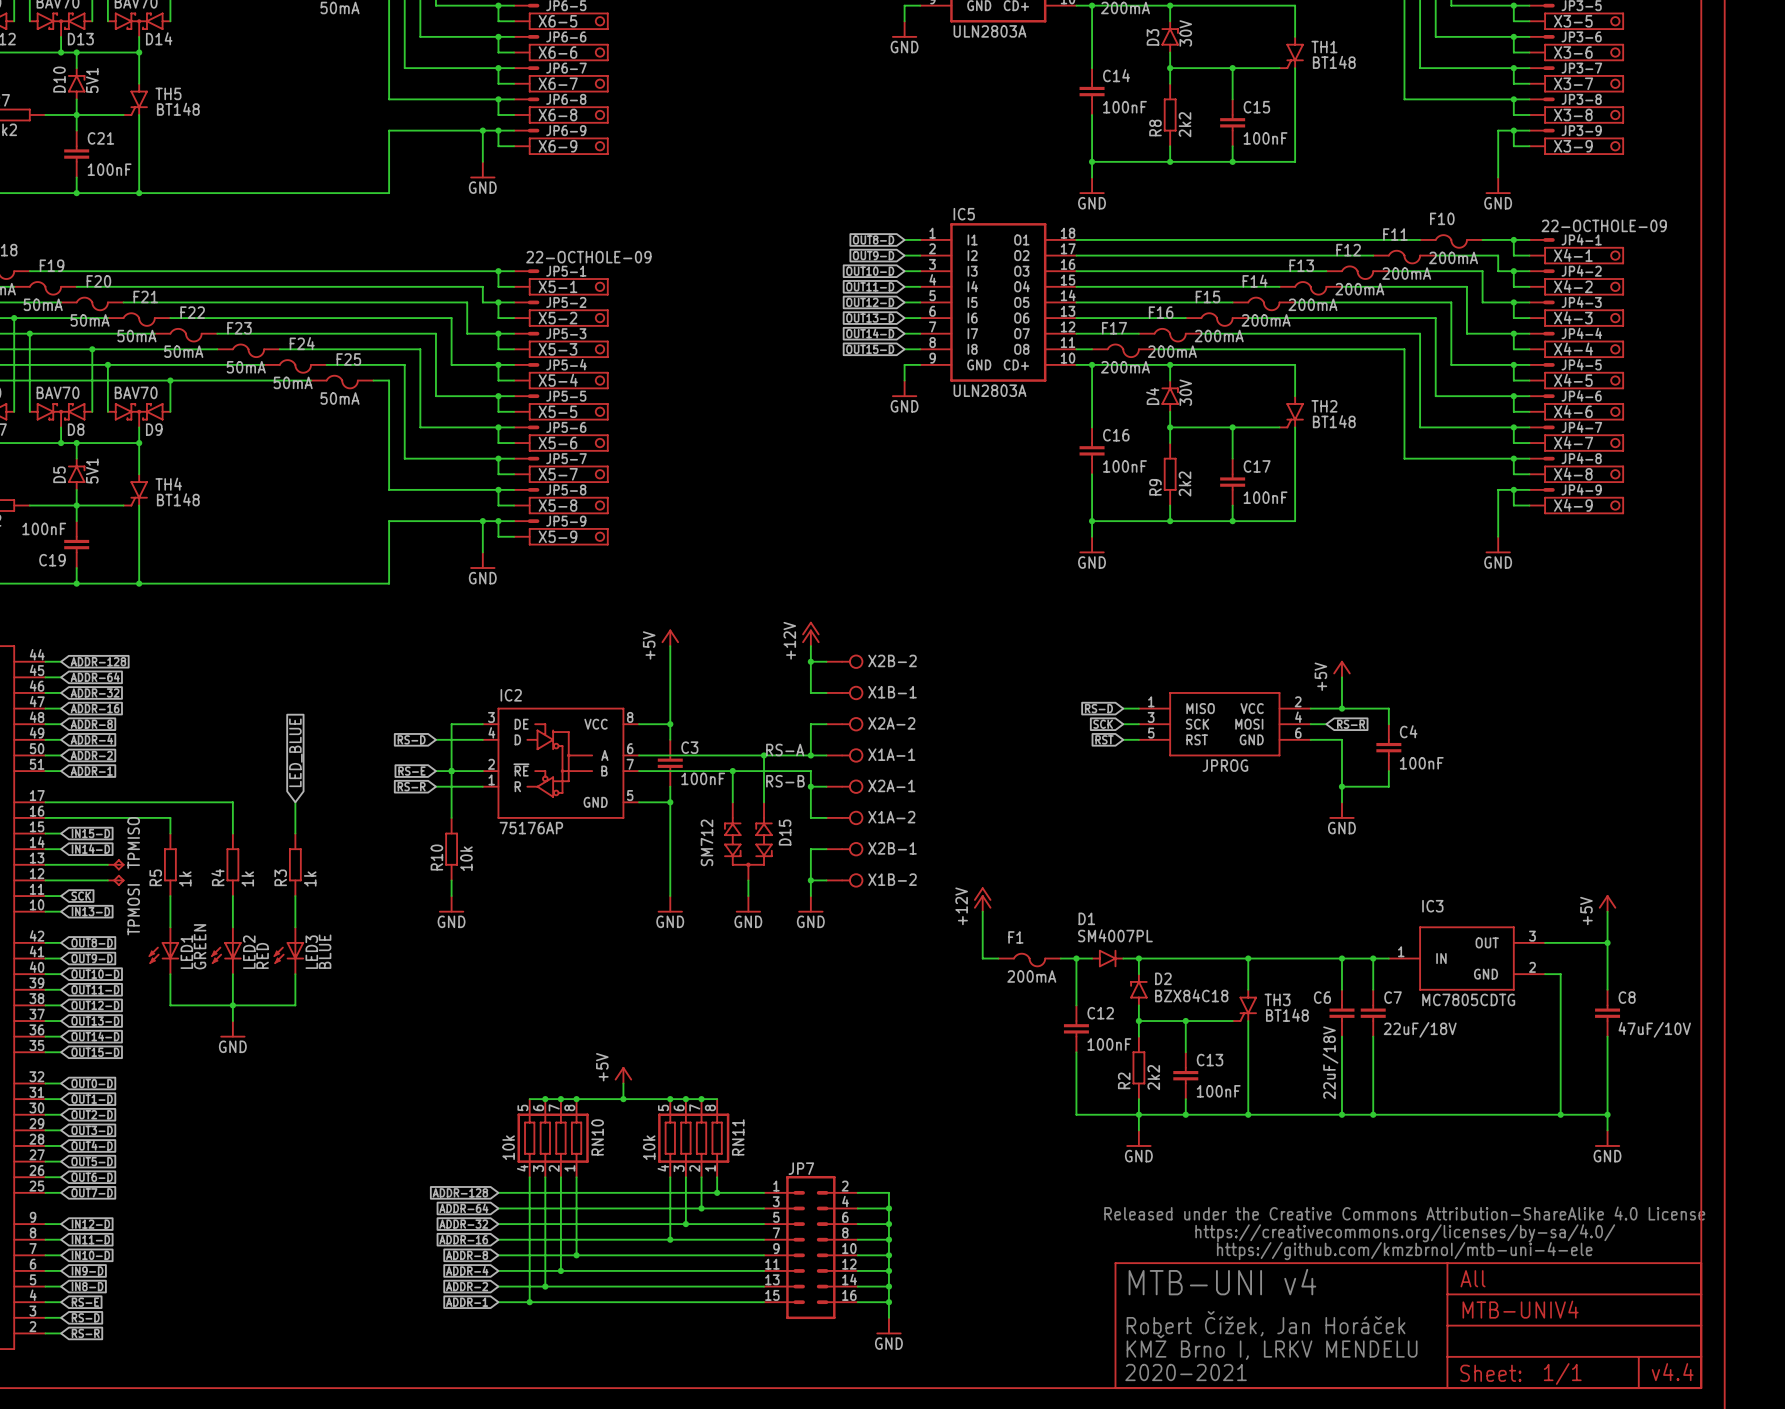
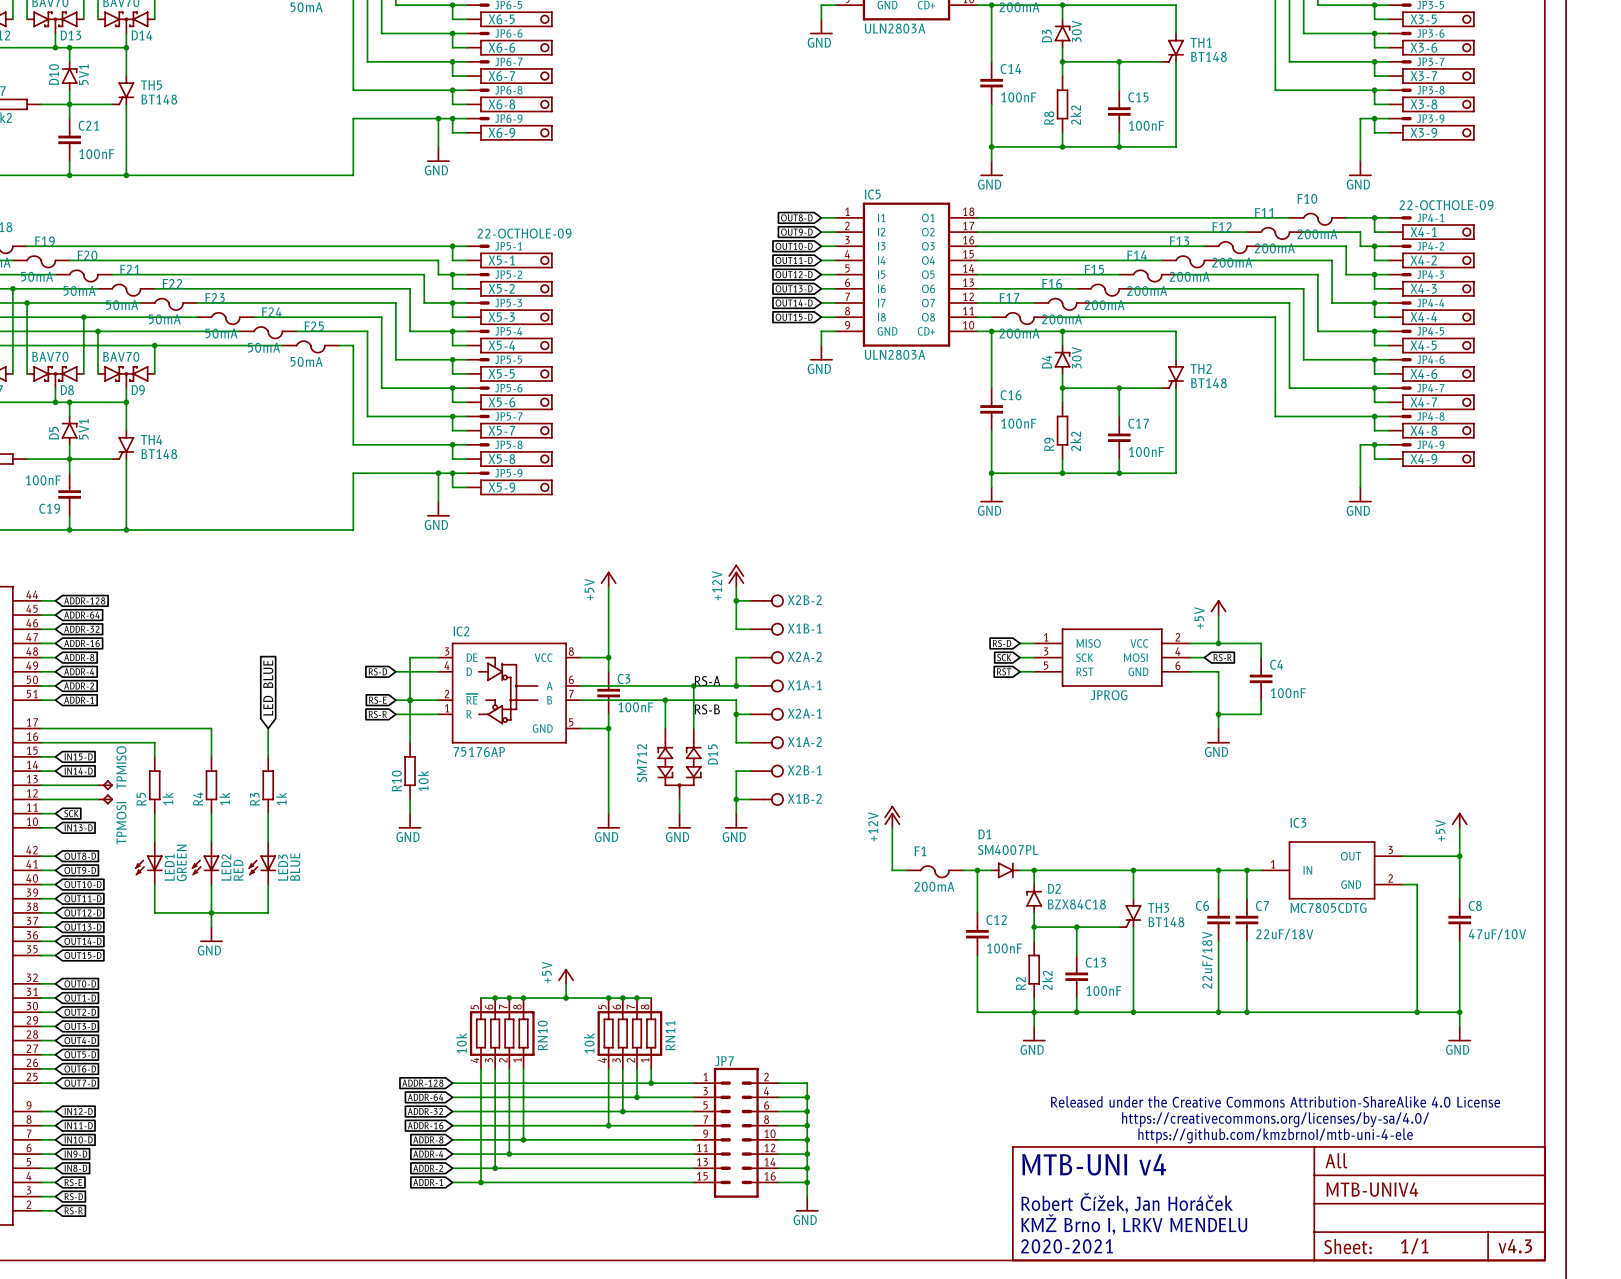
text: v4.4 (1672, 1372) -> v4.3 (1515, 1246)

